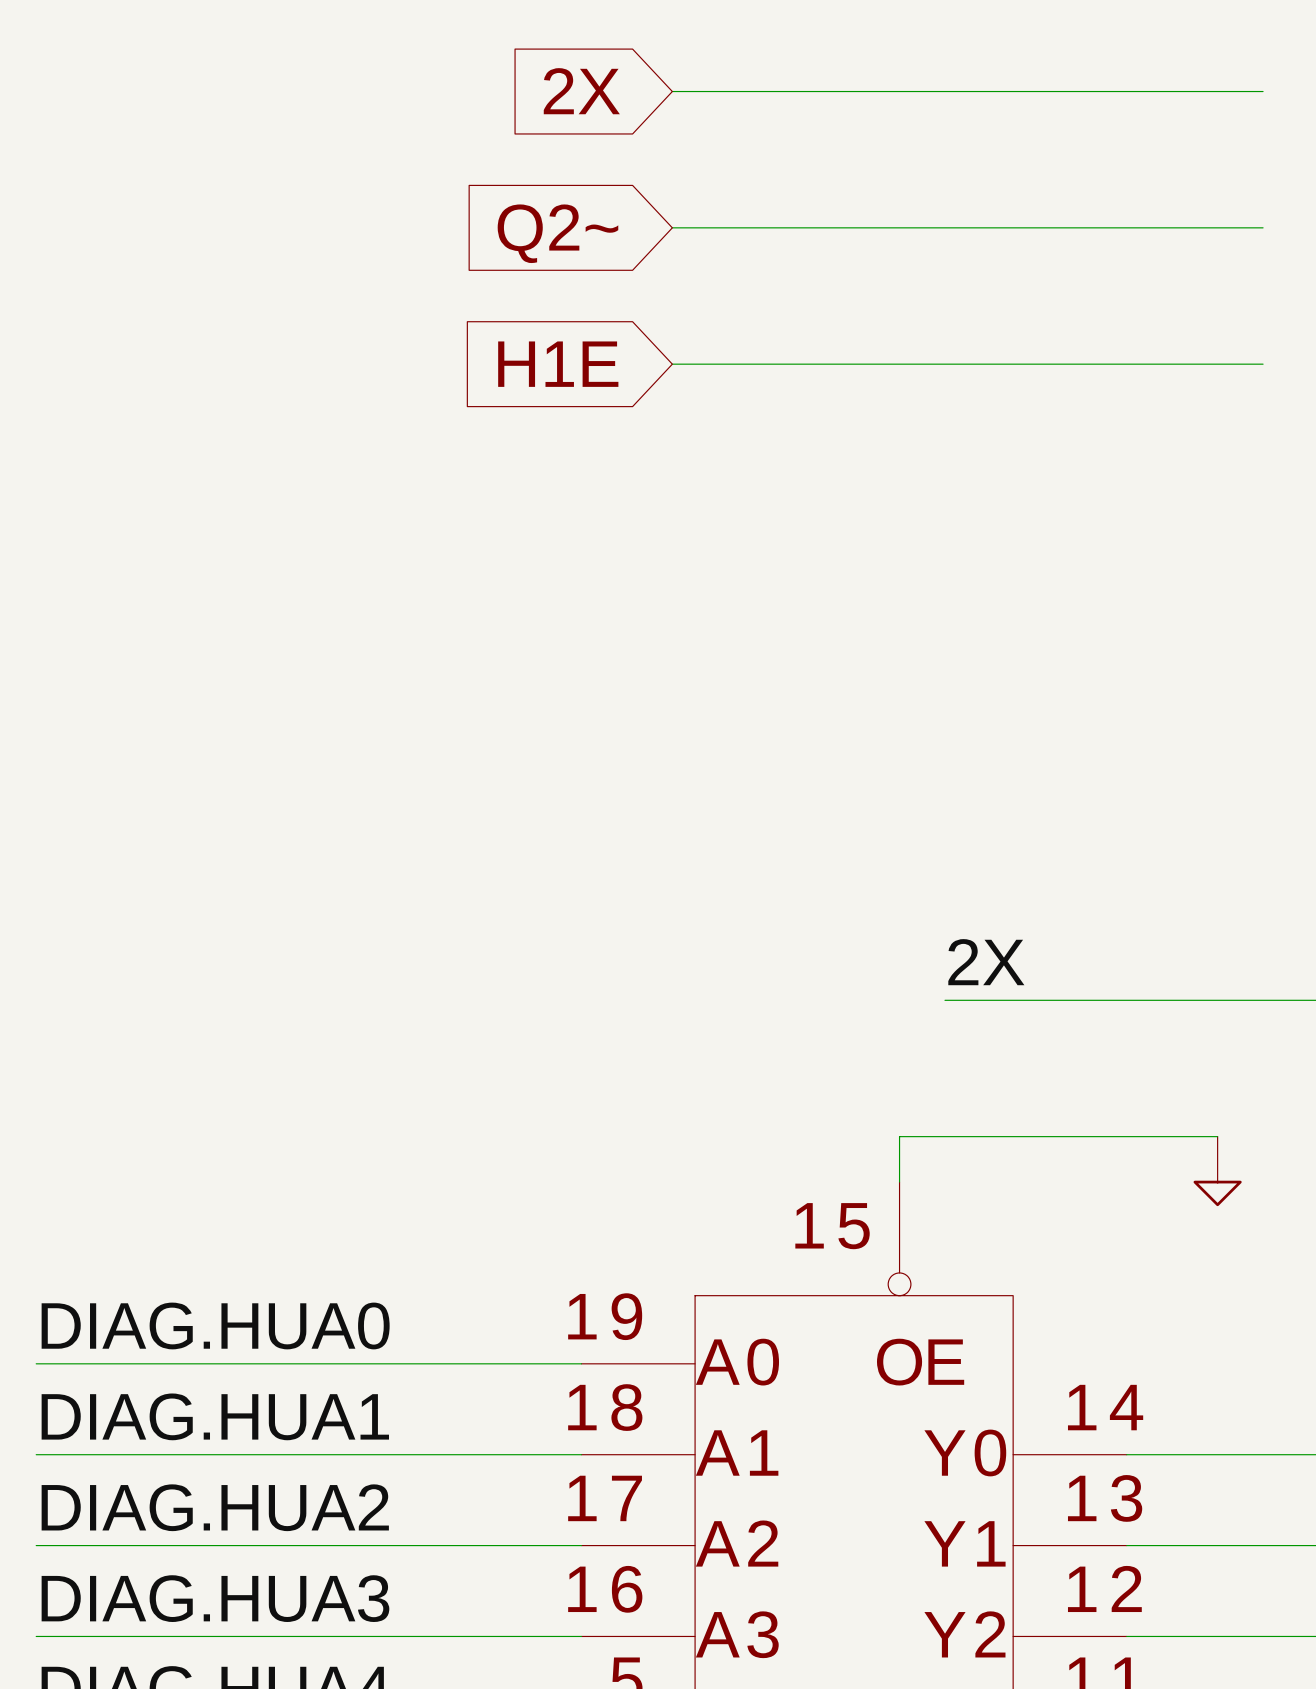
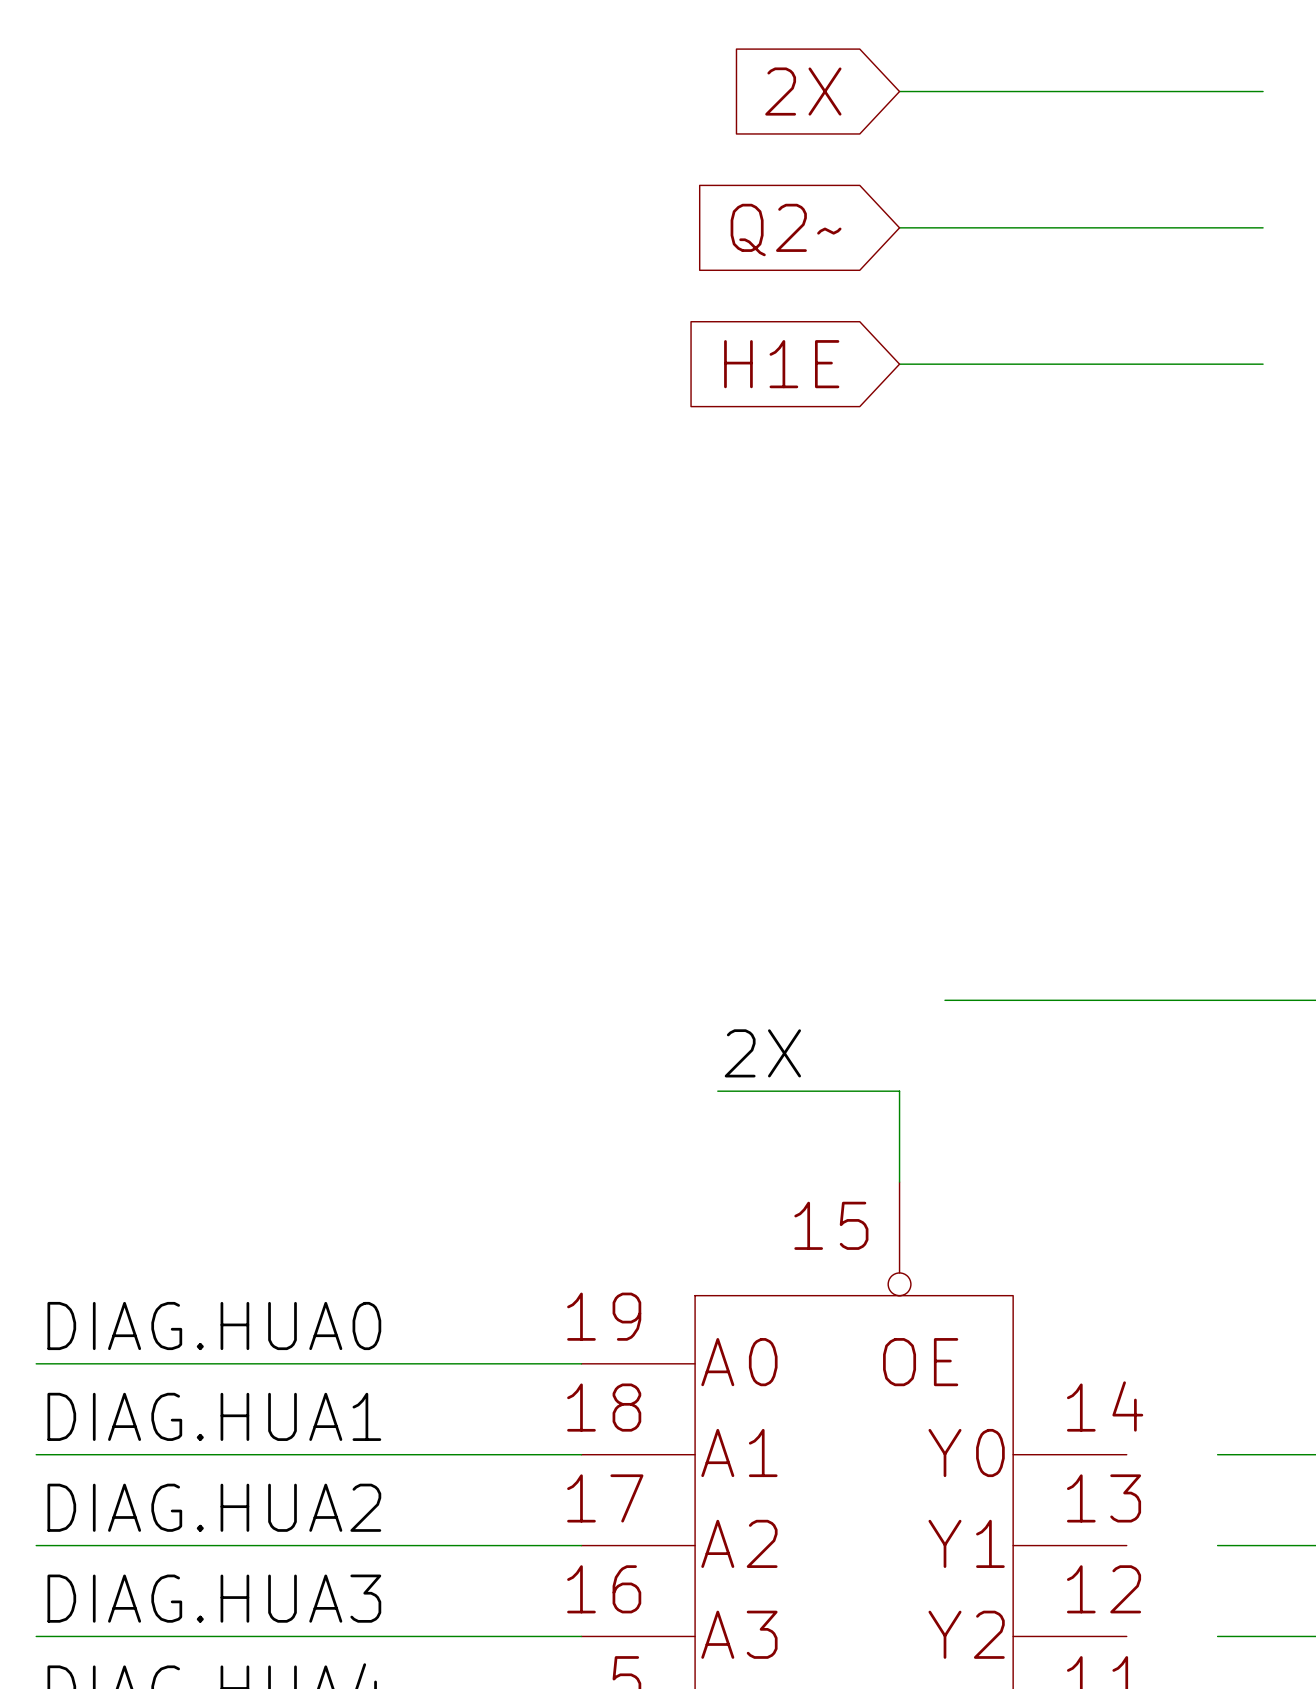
global label position: 2X (581, 91) -> 2X (803, 91)
wire: (672, 91) (899, 91) -> none
wire: (672, 227) (899, 227) -> none
global label position: Q2~ (557, 233) -> Q2~ (786, 230)
global label position: H1E (558, 364) -> H1E (781, 364)
wire: (672, 364) (899, 364) -> none
label position: 2X (986, 962) -> 2X (762, 1053)
wire: (899, 1136) (1217, 1136) -> (899, 1136) (899, 1091) (717, 1091)
power symbol: (1217, 1171) -> none
wire: (1126, 1454) (1217, 1454) -> none
wire: (1126, 1545) (1217, 1545) -> none
wire: (1126, 1636) (1217, 1636) -> none

